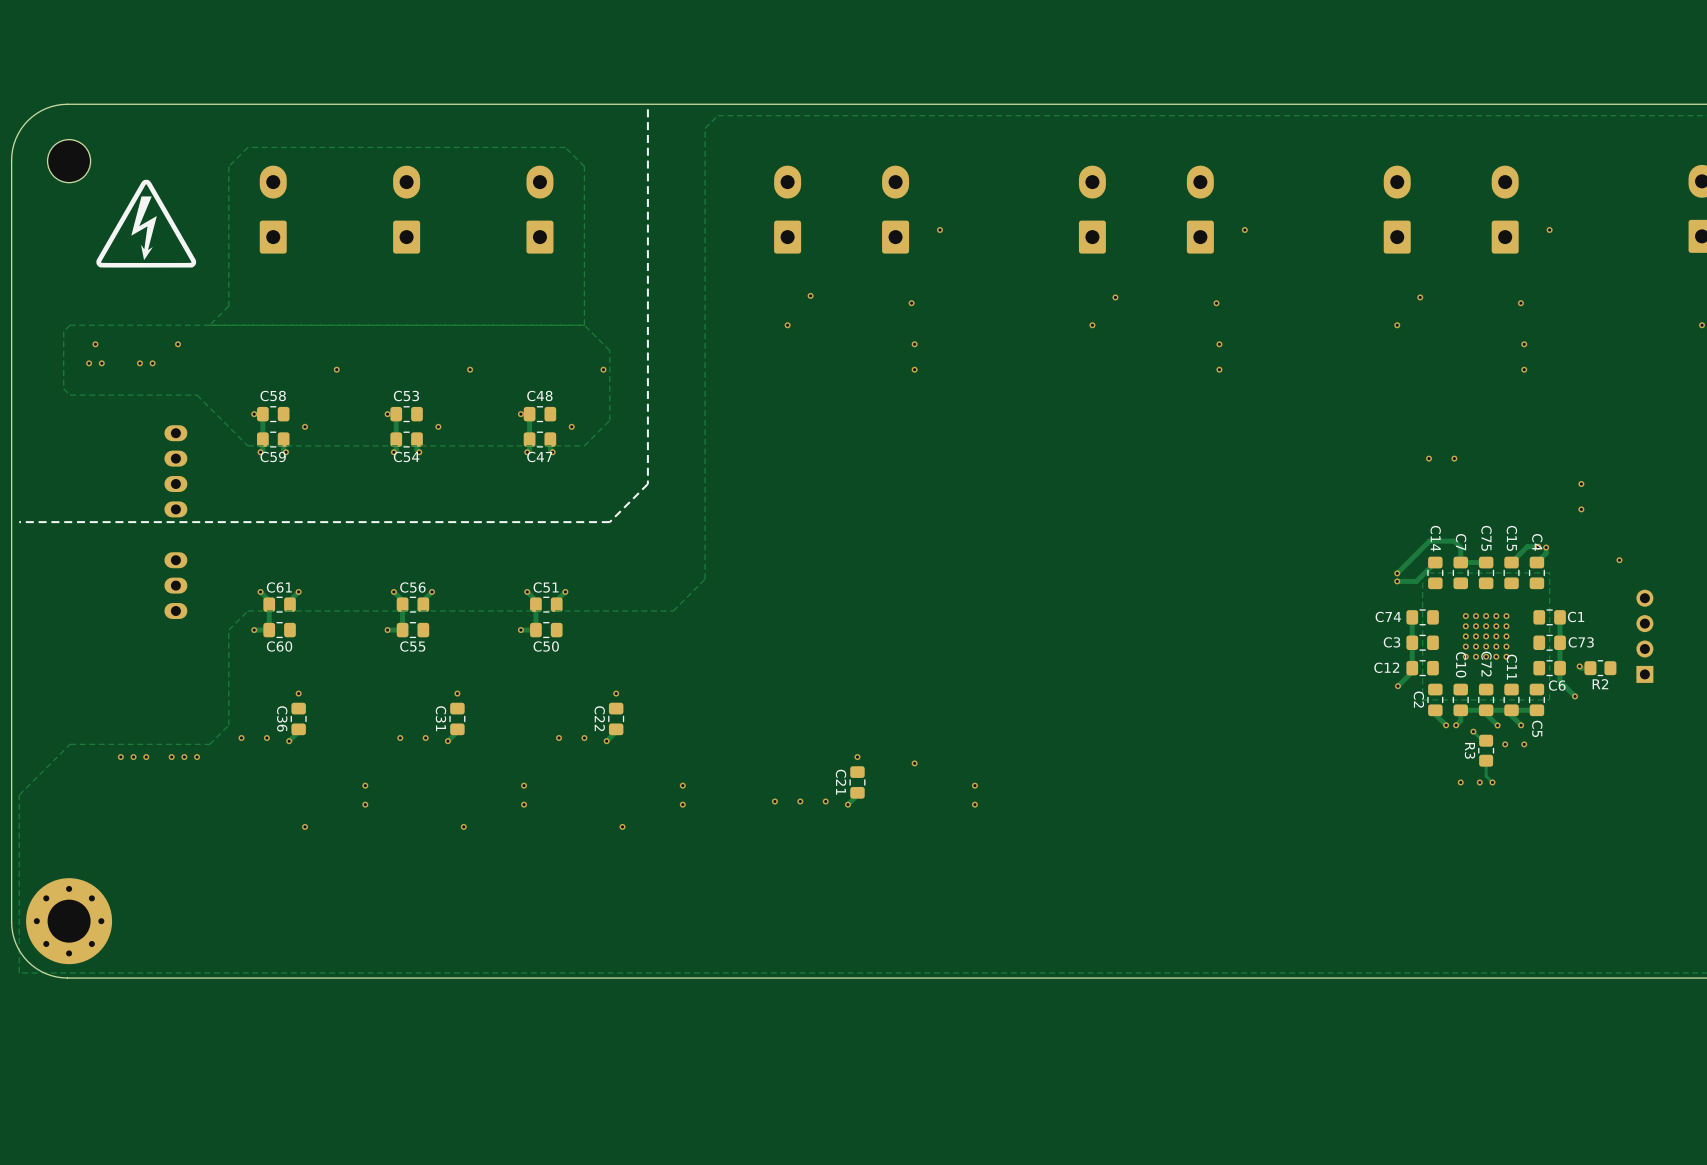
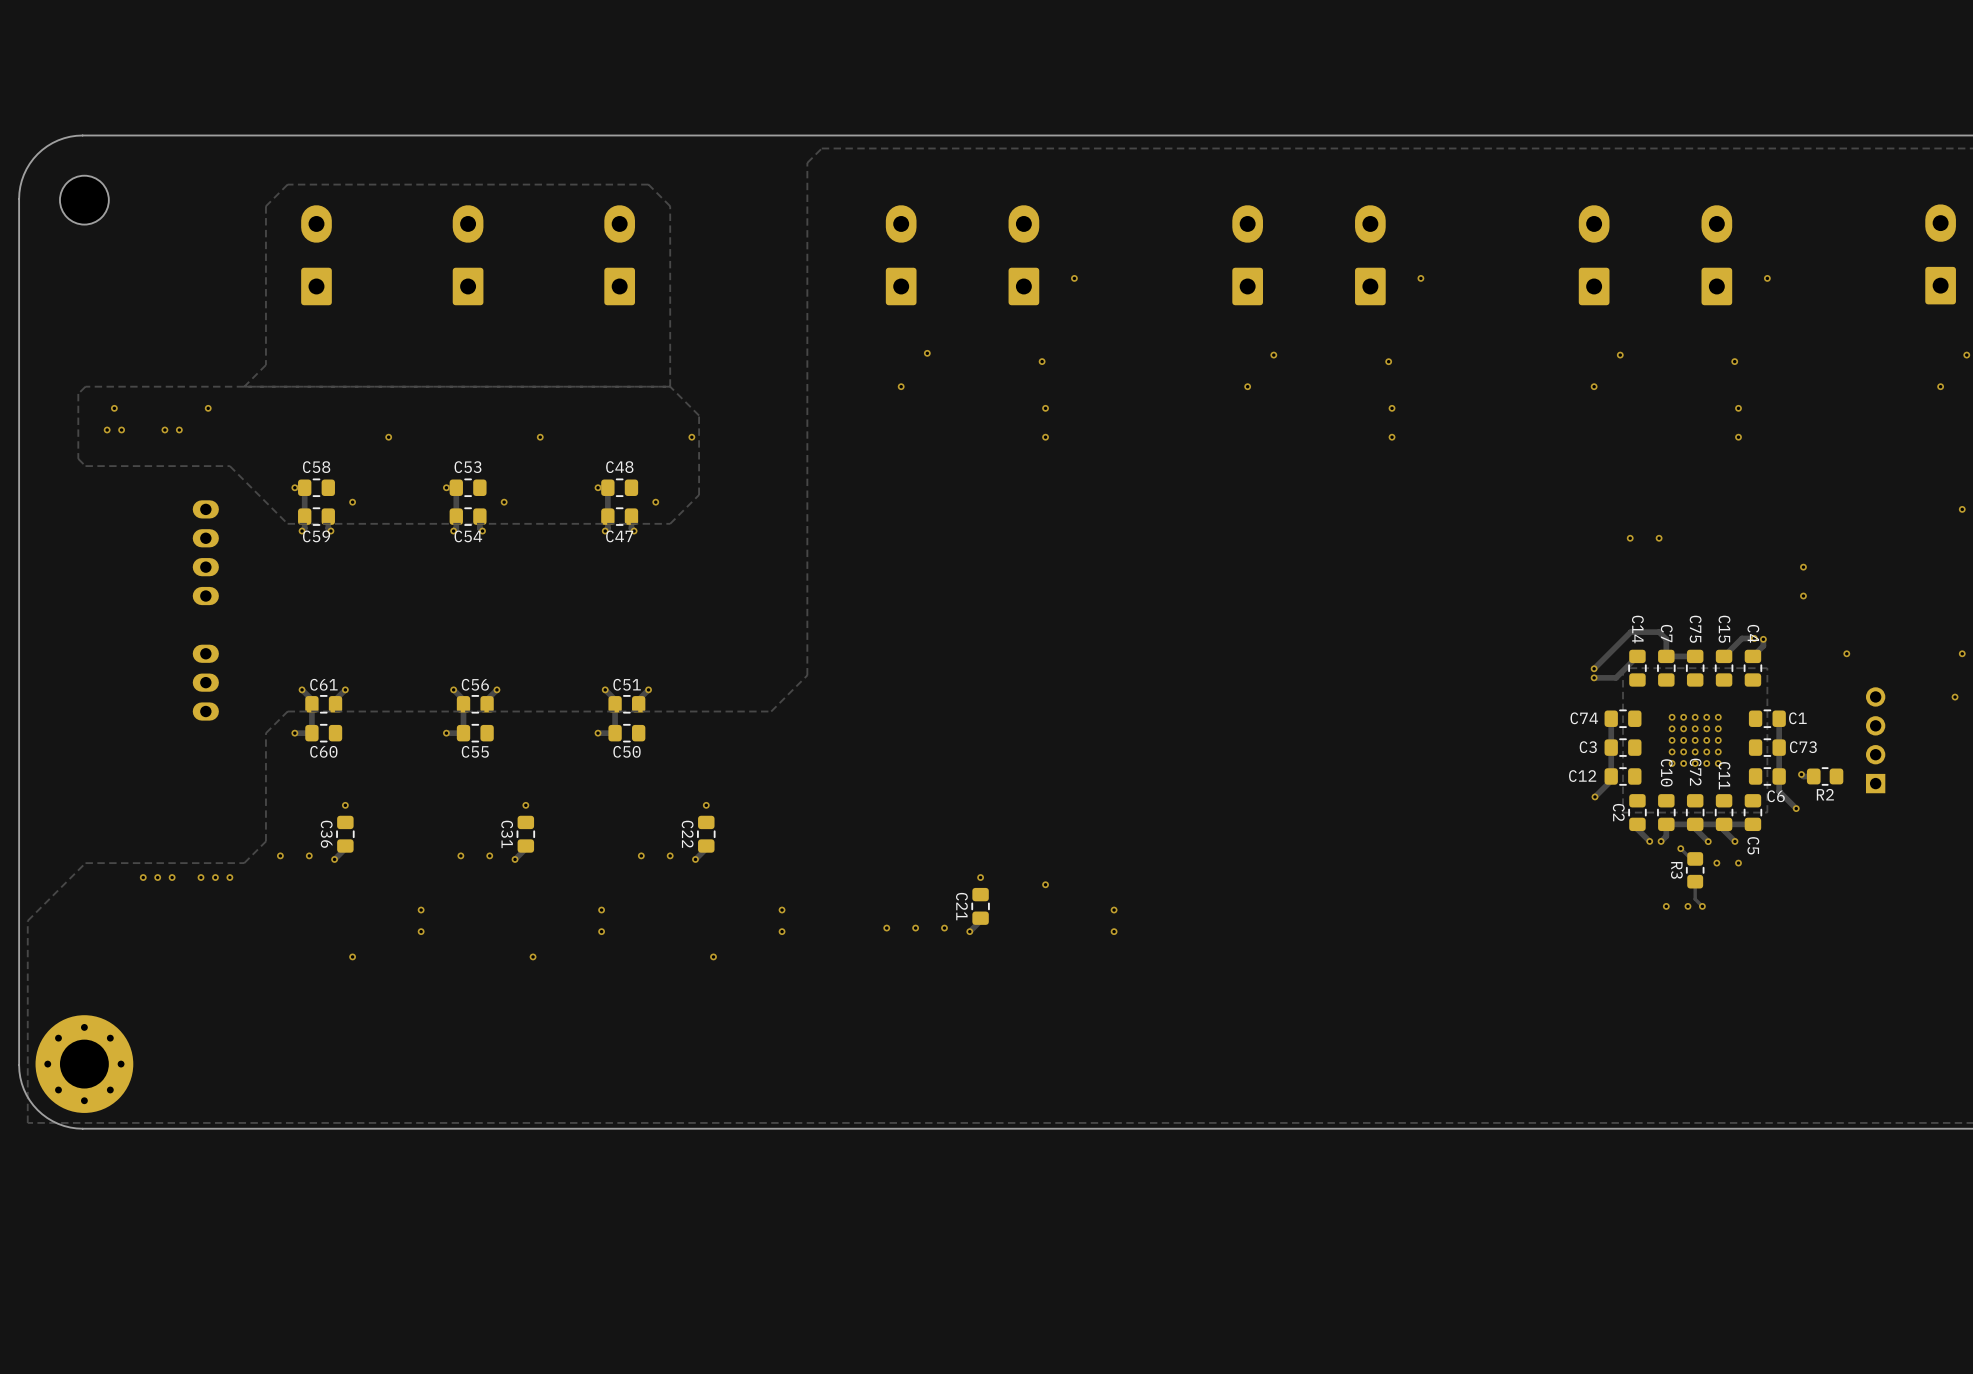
line: (647, 109) (647, 484) (609, 522) (19, 522) -> none
drawing: [96, 179, 197, 268] -> none

